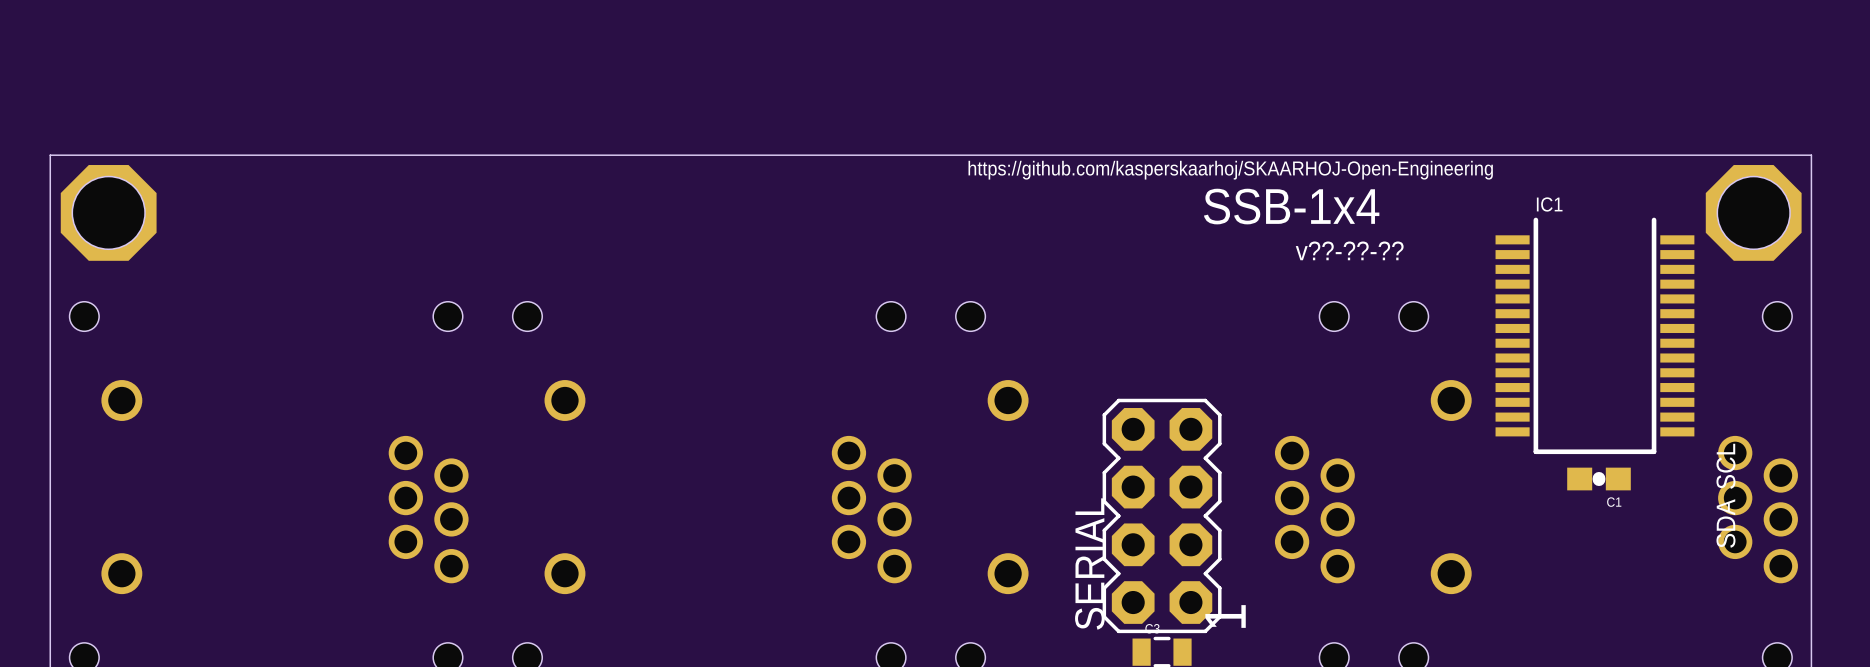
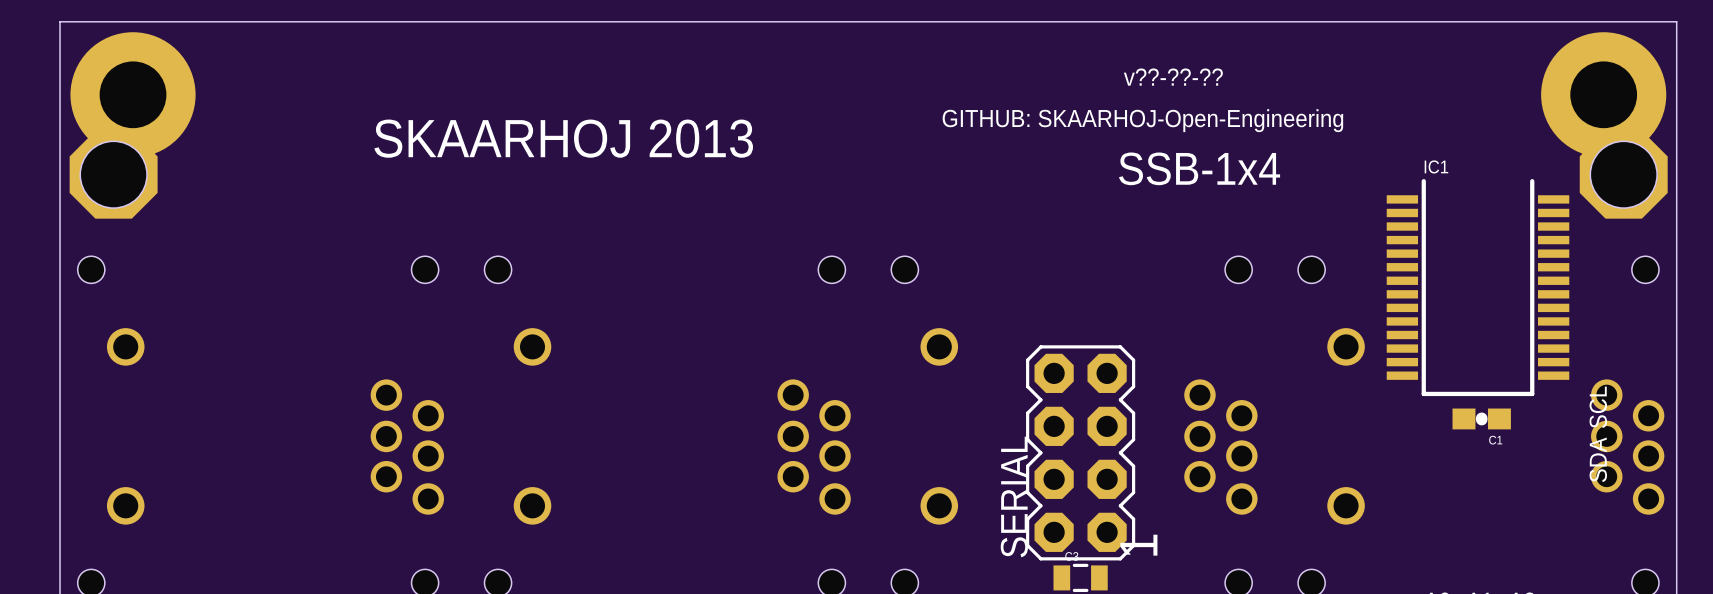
part: none -> (133, 94)
part: none -> (1603, 94)
text: none -> GITHUB: SKAARHOJ-Open-Engineering (1142, 120)
board edge: (1811, 155) (50, 155) -> (1676, 121) (1676, 21) (60, 21) (60, 121)
text: https://github.com/kasperskaarhoj/SKAARHOJ-Open-Engineering (1230, 170) -> none
text: none -> SKAARHOJ 2013 (563, 138)
text position: v??-??-?? (1349, 250) -> v??-??-?? (1173, 77)

